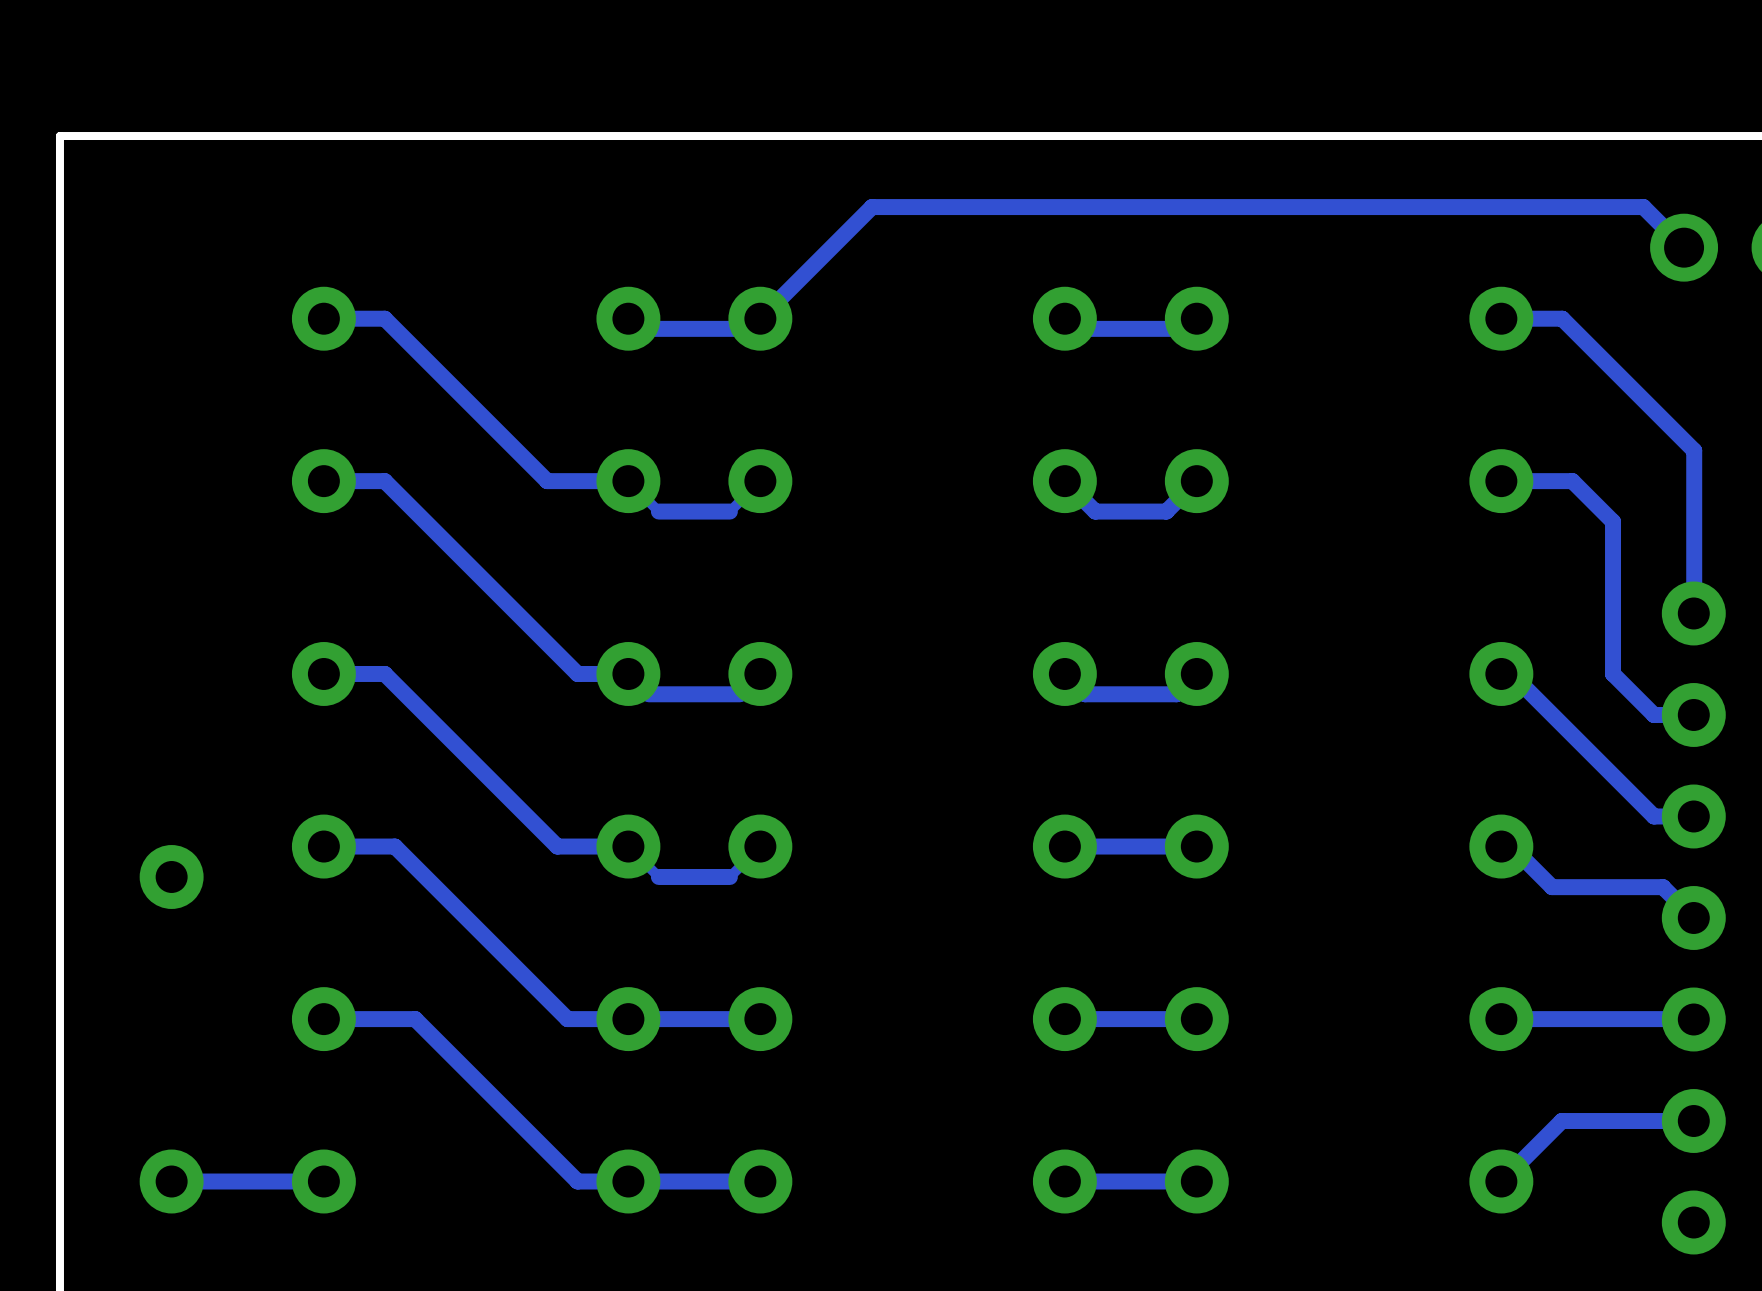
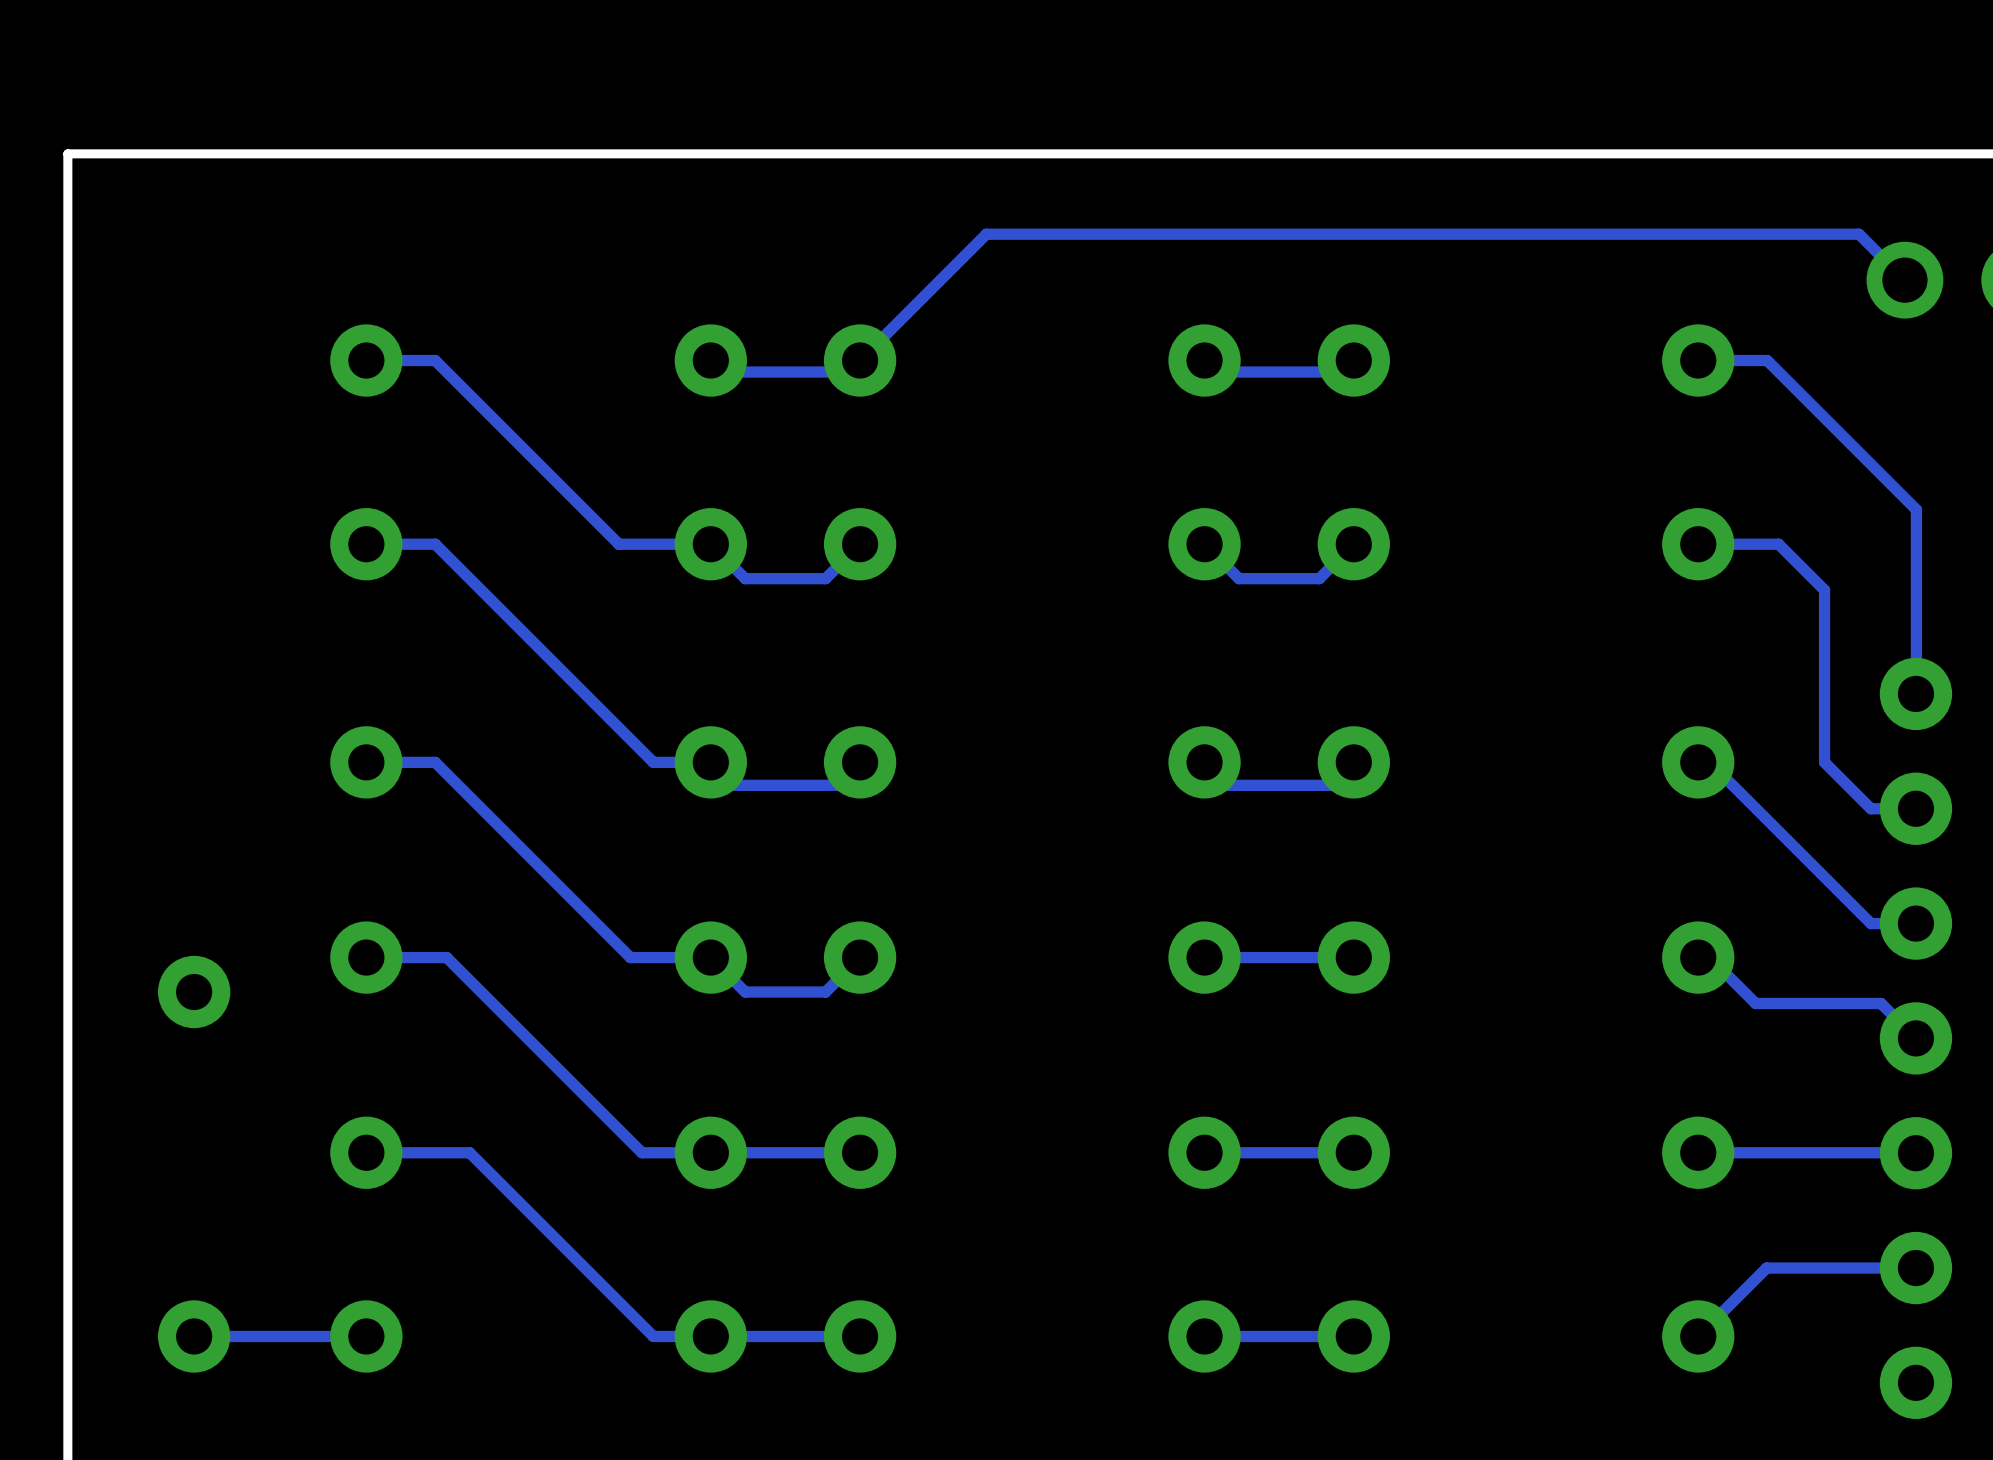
track width: thick (1684, 247) (1643, 207) (872, 207) (760, 318) -> thin (1904, 280) (1859, 234) (986, 234) (860, 360)
track width: thick (323, 318) (384, 318) (547, 481) (628, 481) -> thin (366, 360) (435, 360) (618, 544) (710, 544)
track width: thick (1501, 318) (1562, 318) (1694, 450) (1694, 613) -> thin (1698, 360) (1767, 360) (1916, 509) (1916, 693)
track width: thick (750, 328) (638, 328) -> thin (848, 372) (722, 372)
track width: thick (1186, 328) (1075, 328) -> thin (1342, 372) (1216, 372)
track width: thick (323, 481) (384, 481) (577, 673) (628, 673) -> thin (366, 544) (435, 544) (653, 762) (710, 762)
track width: thick (1196, 481) (1166, 511) (1095, 511) (1064, 481) -> thin (1353, 544) (1319, 578) (1239, 578) (1204, 544)
track width: thick (1501, 481) (1572, 481) (1613, 521) (1613, 673) (1654, 714) (1693, 714) -> thin (1698, 544) (1778, 544) (1824, 590) (1824, 762) (1870, 808) (1915, 808)
track width: thick (729, 511) (658, 511) -> thin (825, 578) (745, 578)
track width: thick (323, 673) (384, 673) (557, 846) (628, 846) -> thin (366, 762) (435, 762) (630, 957) (710, 957)
track width: thick (1196, 673) (1176, 694) (1085, 694) (1064, 673) -> thin (1353, 762) (1330, 785) (1227, 785) (1204, 762)
track width: thick (1511, 673) (1654, 816) (1693, 816) -> thin (1709, 762) (1870, 923) (1915, 923)
track width: thick (740, 694) (648, 694) -> thin (837, 785) (733, 785)
track width: thick (323, 846) (394, 846) (567, 1019) (760, 1019) -> thin (366, 957) (446, 957) (641, 1152) (860, 1152)
track width: thick (1196, 846) (1064, 846) -> thin (1353, 957) (1204, 957)
track width: thick (1511, 846) (1552, 887) (1662, 887) (1693, 917) -> thin (1709, 957) (1755, 1003) (1881, 1003) (1915, 1038)
track width: thick (729, 876) (658, 876) -> thin (825, 992) (745, 992)
track width: thick (323, 1019) (415, 1019) (577, 1181) (760, 1181) -> thin (366, 1152) (469, 1152) (653, 1336) (860, 1336)
track width: thick (1196, 1019) (1064, 1019) -> thin (1353, 1152) (1204, 1152)
track width: thick (1693, 1019) (1501, 1019) -> thin (1915, 1152) (1698, 1152)
track width: thick (1693, 1121) (1561, 1121) (1501, 1181) -> thin (1915, 1268) (1766, 1268) (1698, 1336)
track width: thick (323, 1181) (171, 1181) -> thin (366, 1336) (194, 1336)
track width: thick (1196, 1181) (1064, 1181) -> thin (1353, 1336) (1204, 1336)

